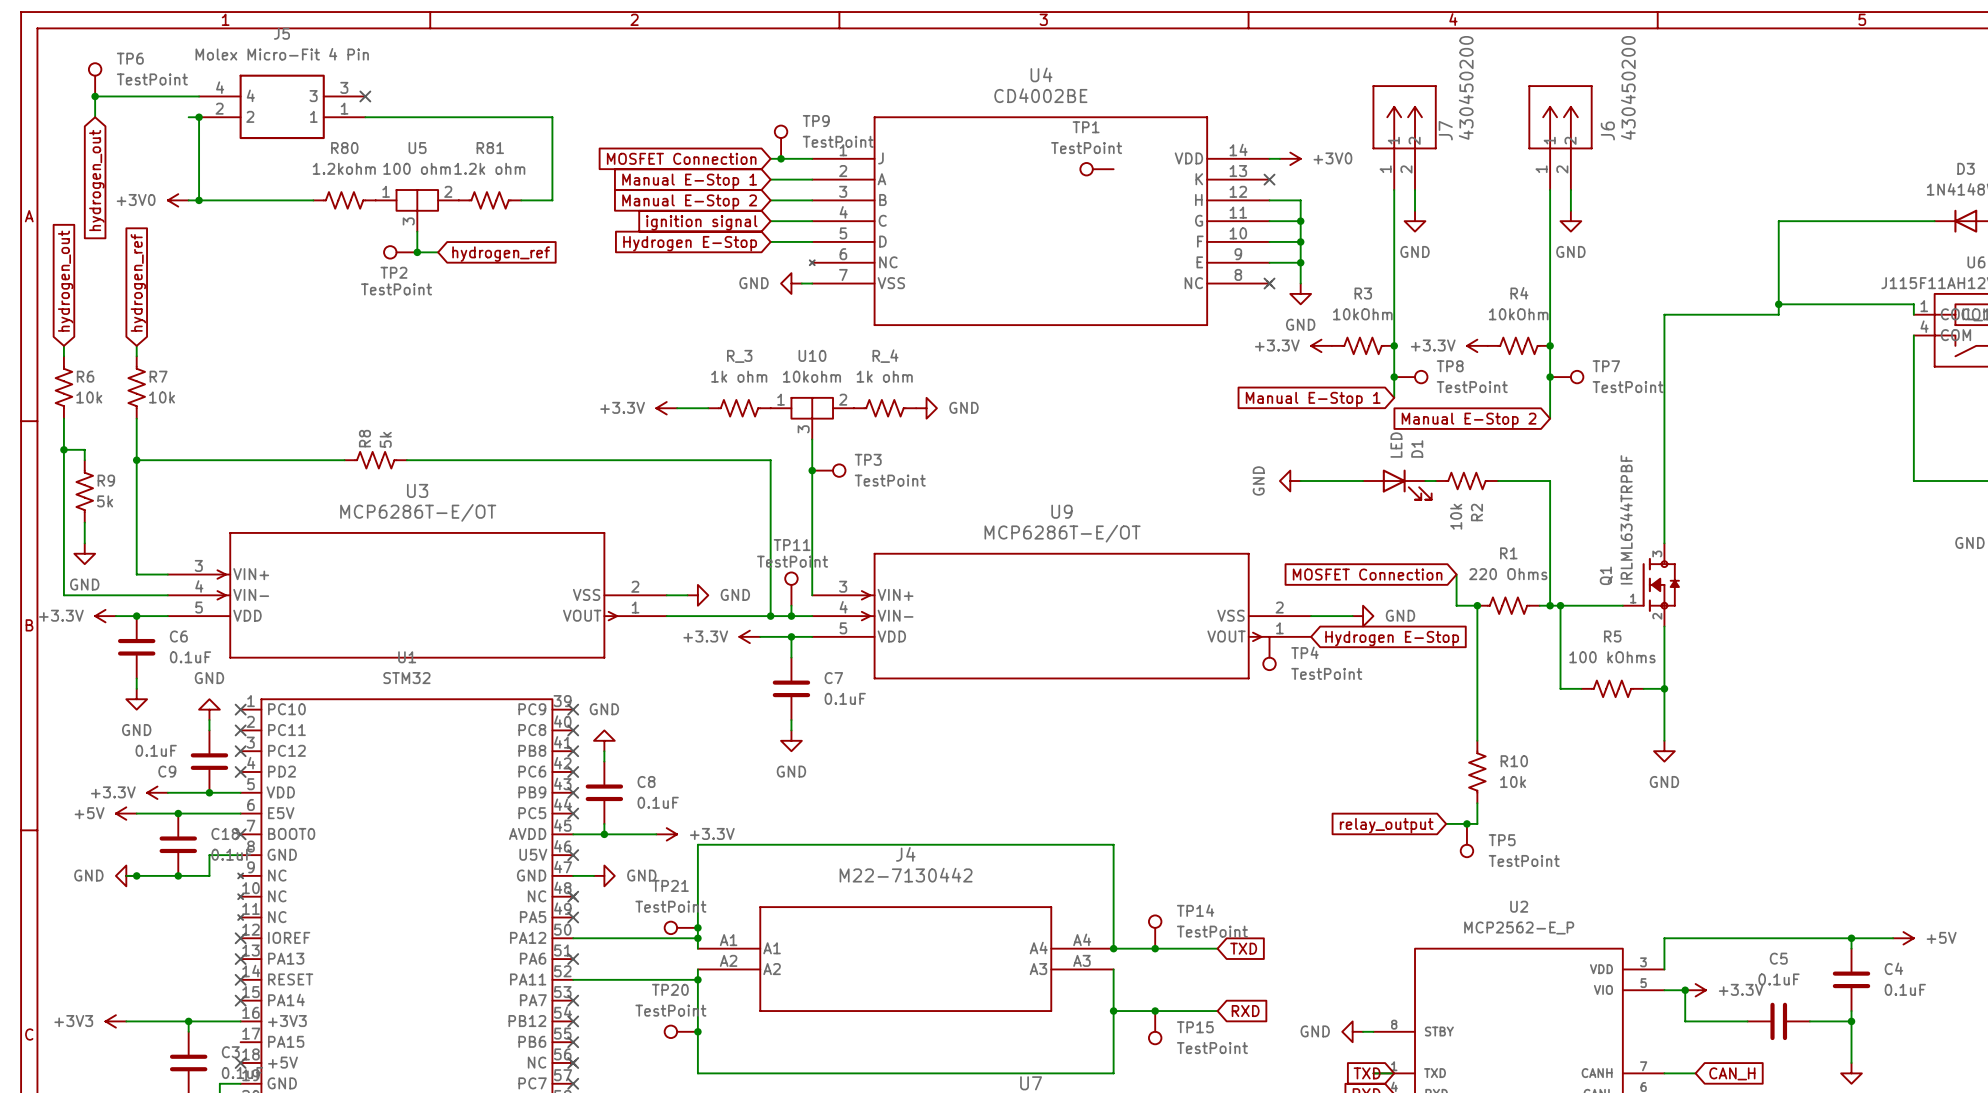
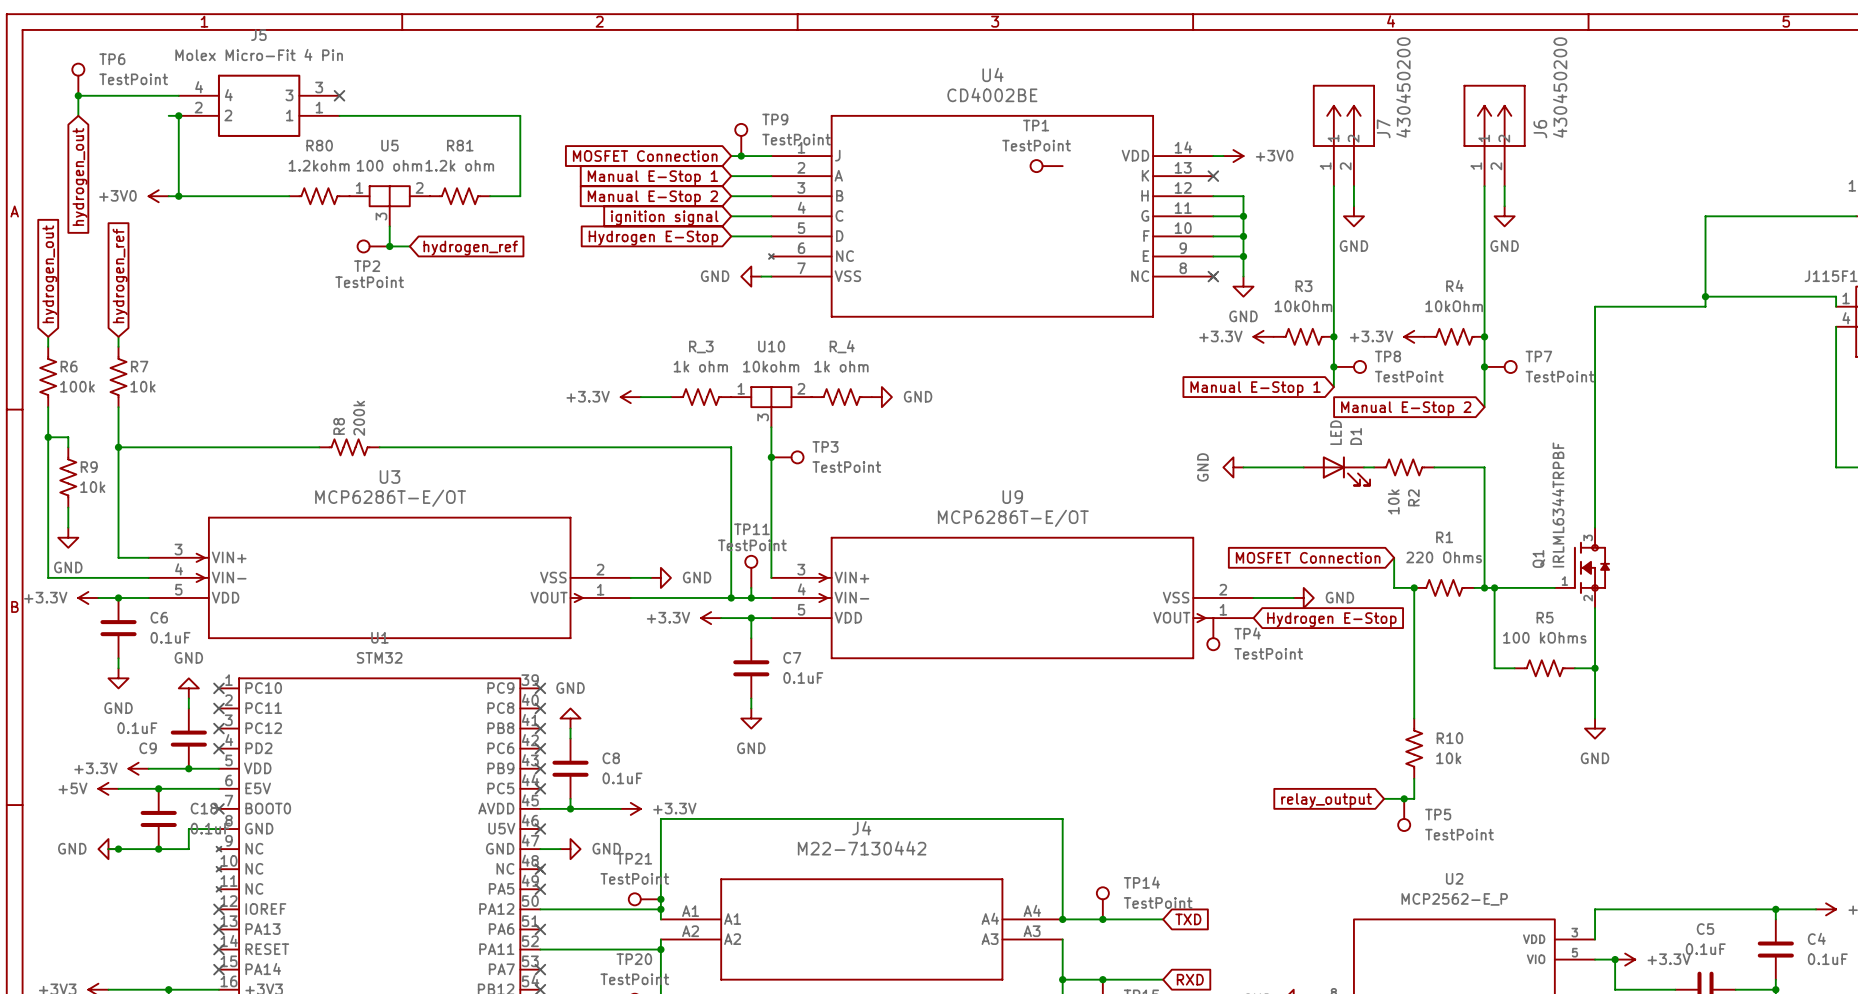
R6 value: 10k (89, 397) -> 100k (77, 386)
R8 value: 5k (385, 439) -> 200k (359, 418)
R9 value: 5k (105, 501) -> 10k (92, 487)

